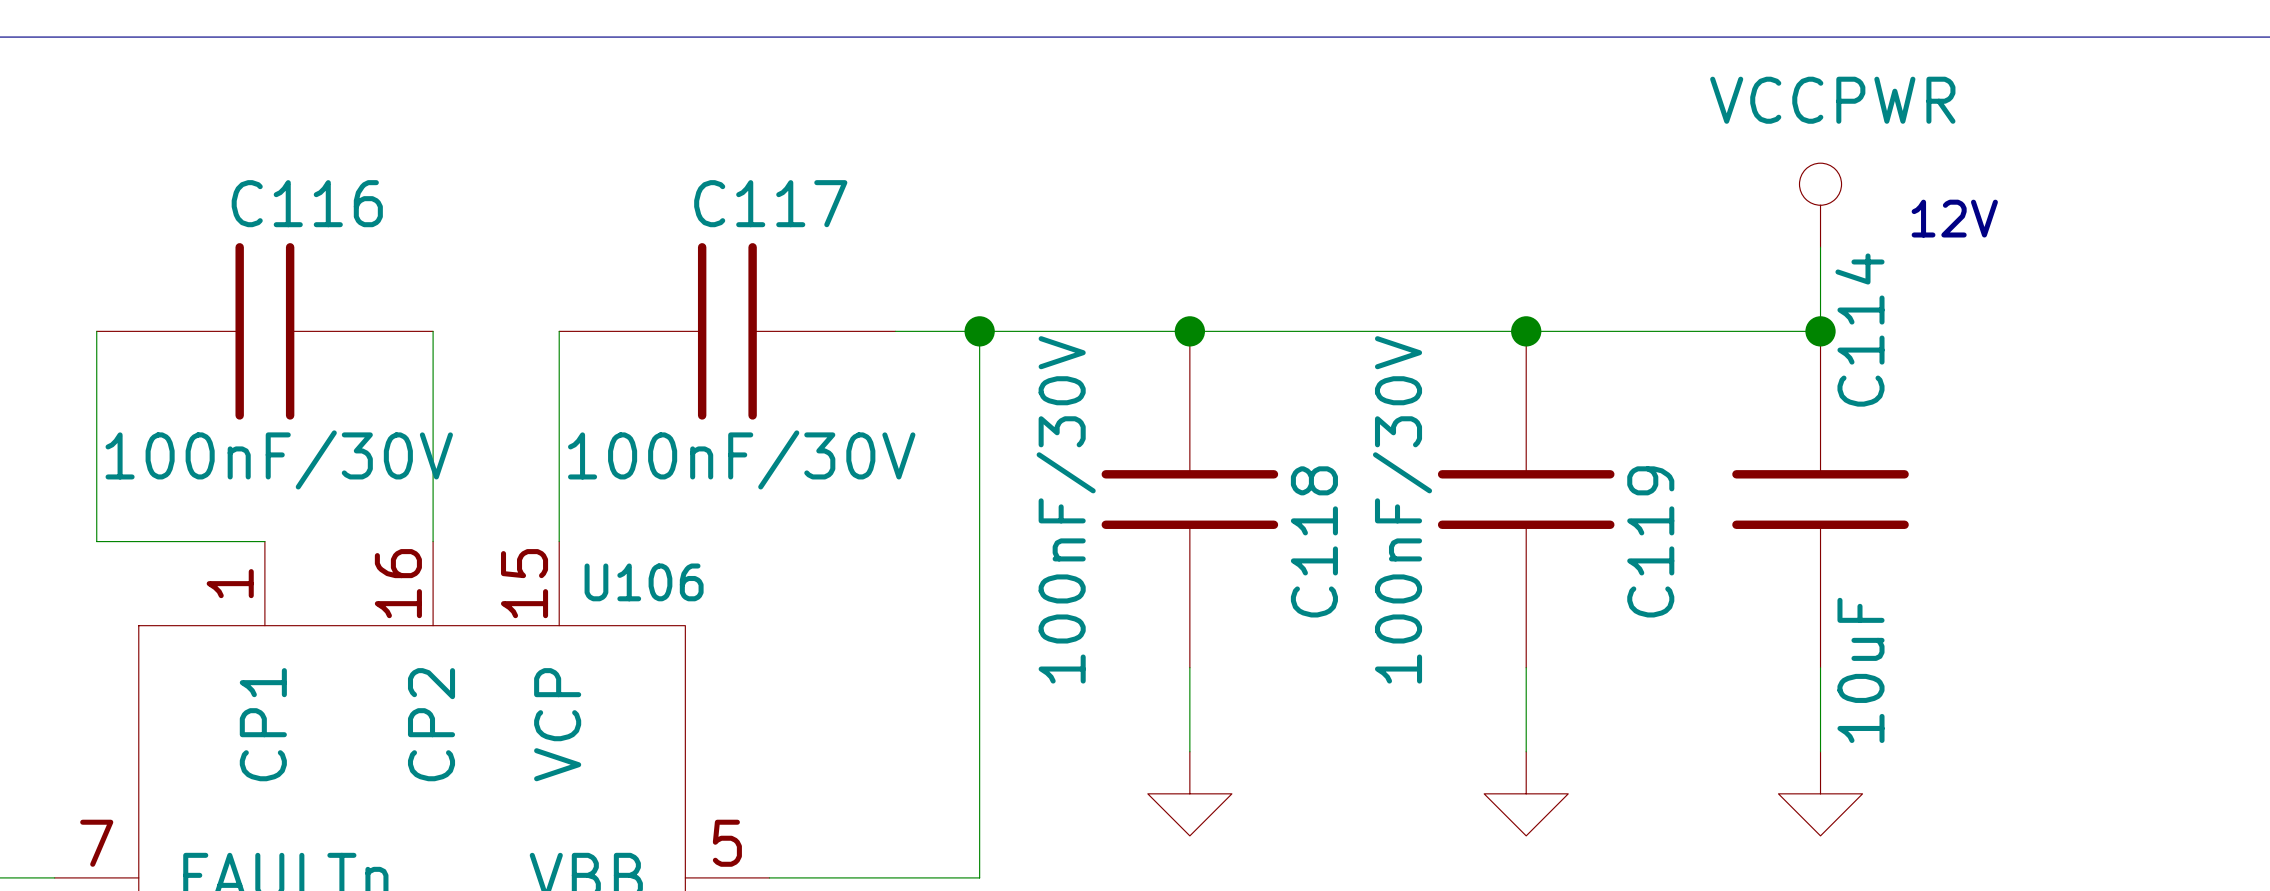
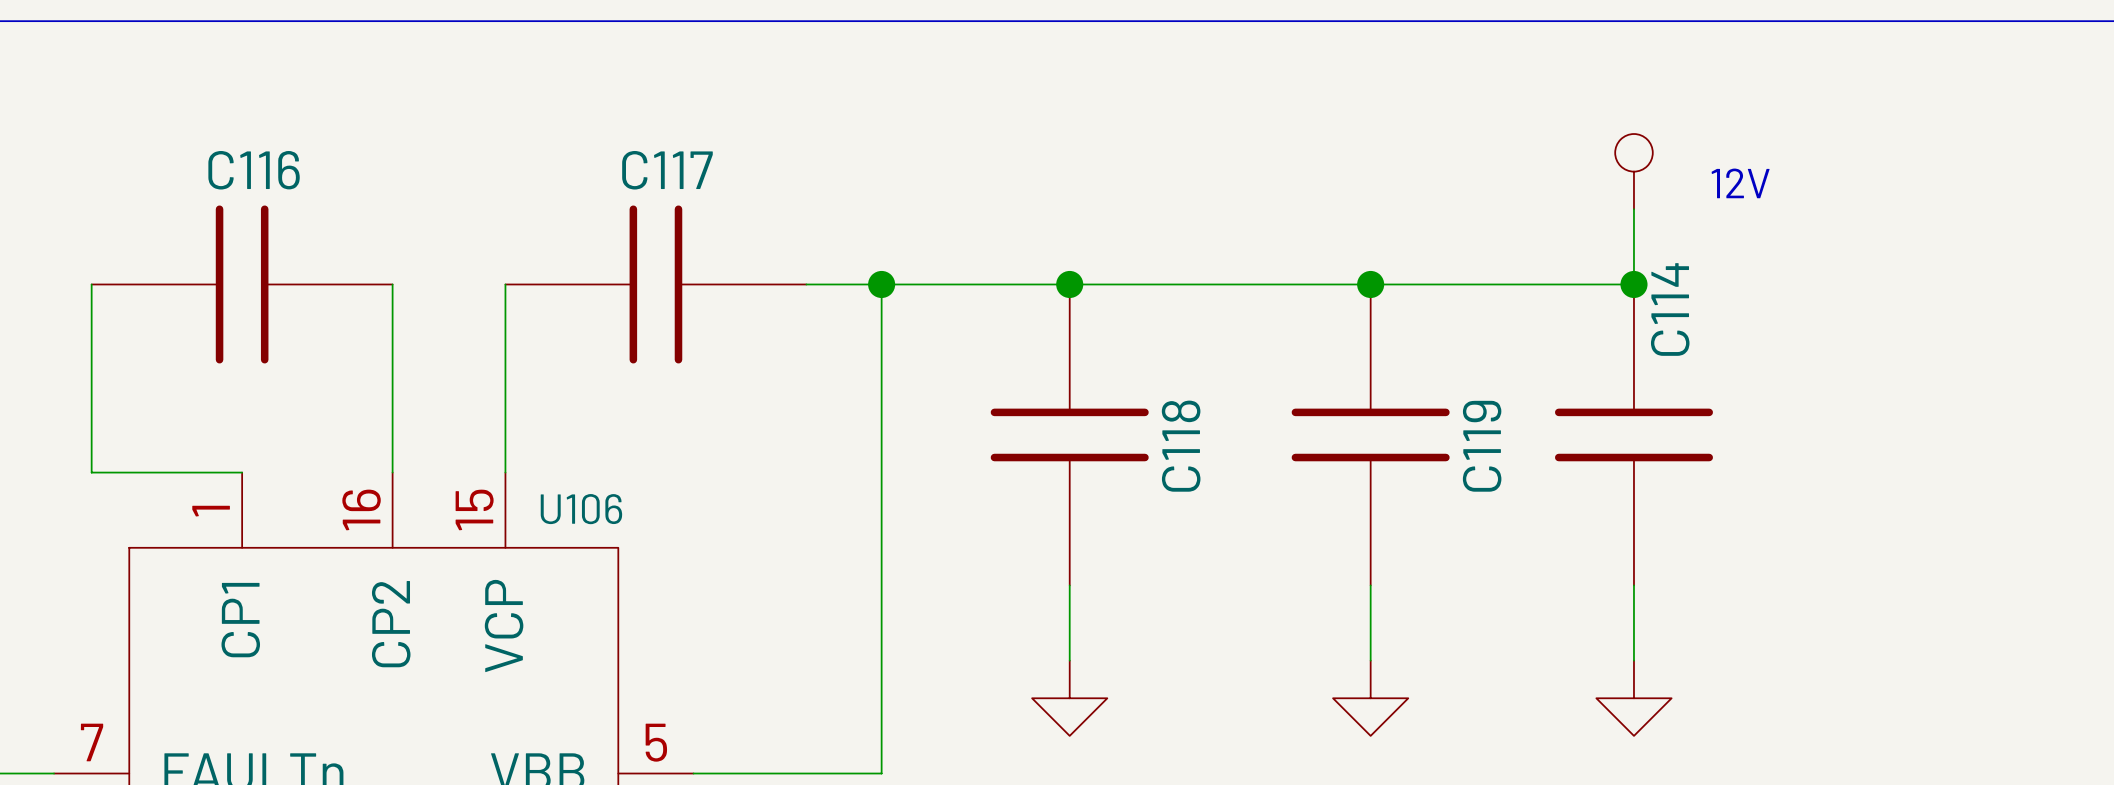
power symbol text: VCCPWR (1832, 100) -> none
C116 value: 100nF/30V (279, 459) -> none
C117 value: 100nF/30V (741, 459) -> none
C118 value: 100nF/30V (1066, 509) -> none
C119 value: 100nF/30V (1402, 509) -> none
C114 value: 10uF (1860, 670) -> none

